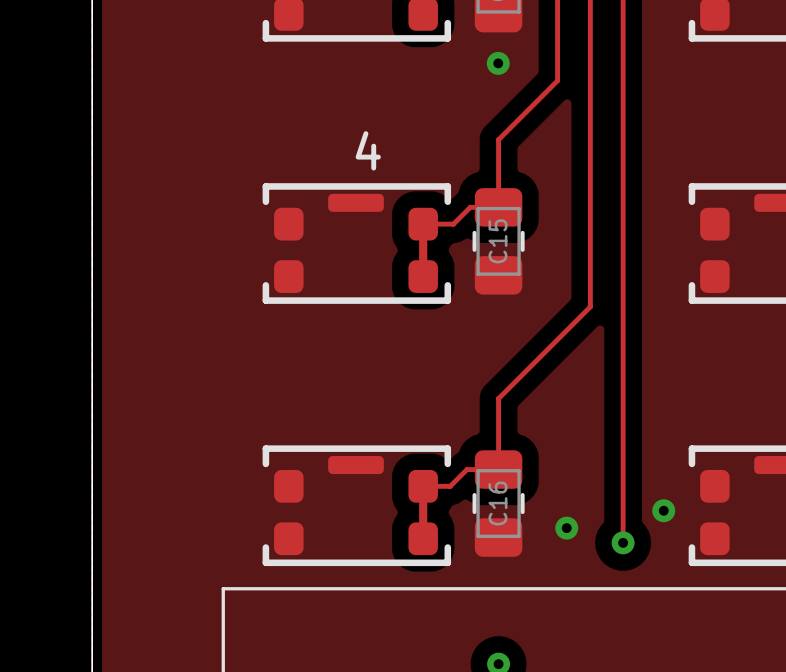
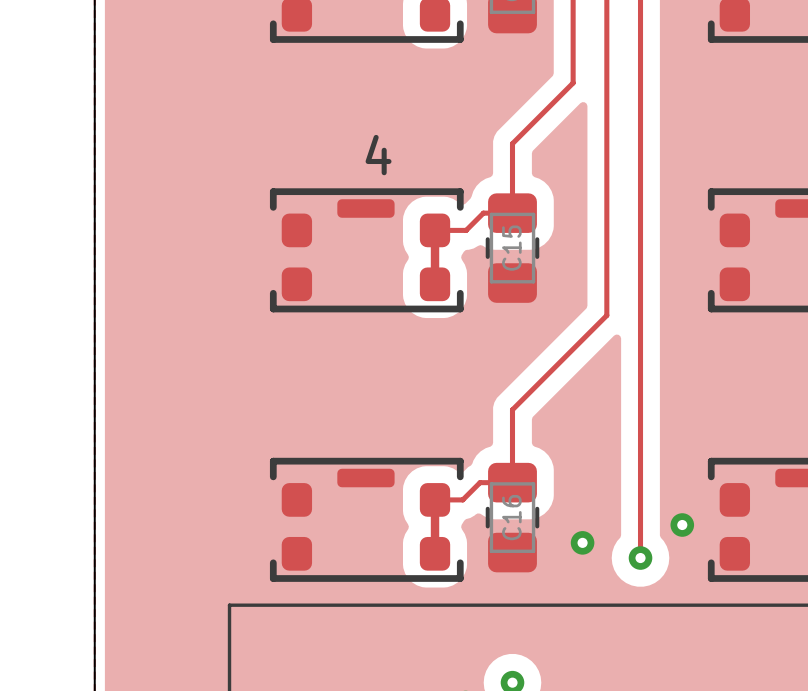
via: (498, 63) -> none

